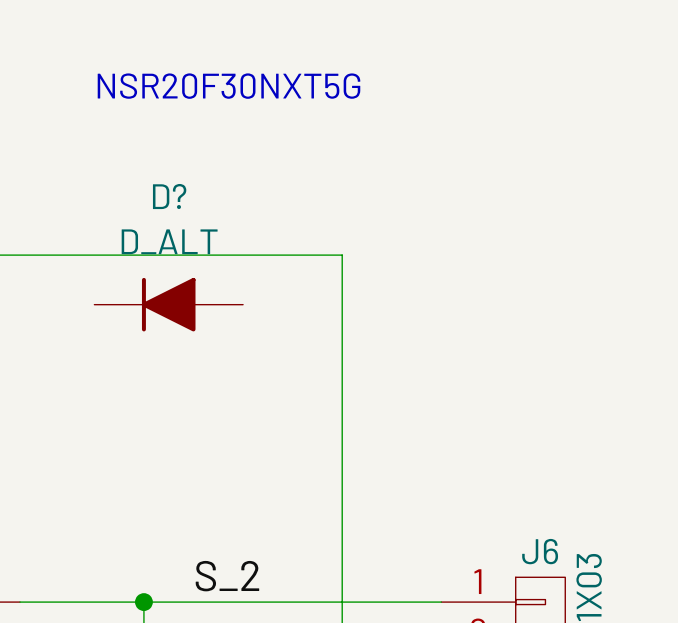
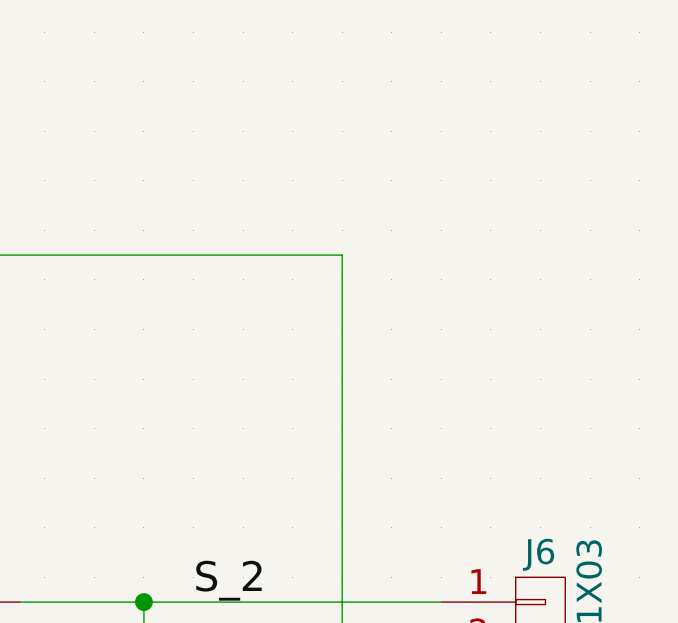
text: NSR20F30NXT5G (228, 86) -> none
D?: D_ALT (168, 304) -> none

